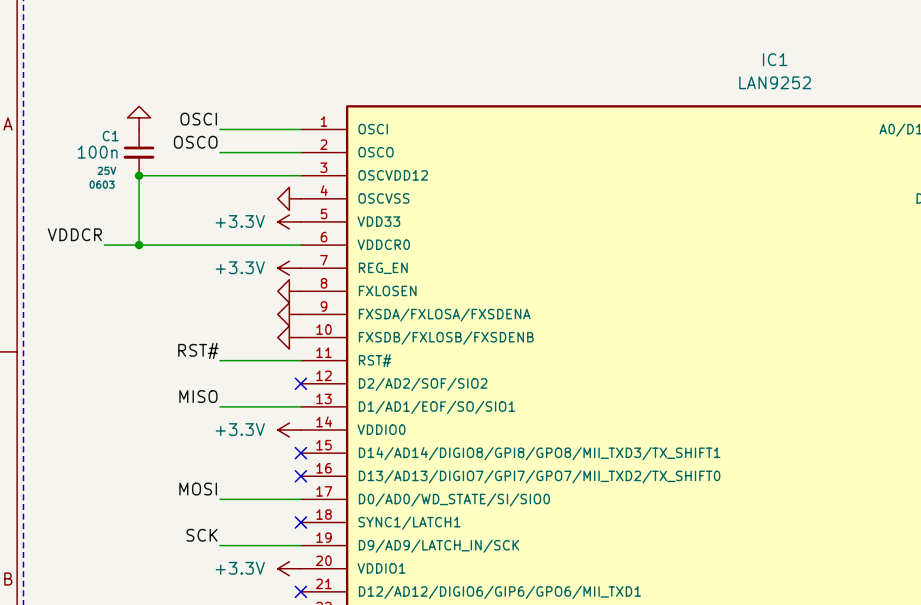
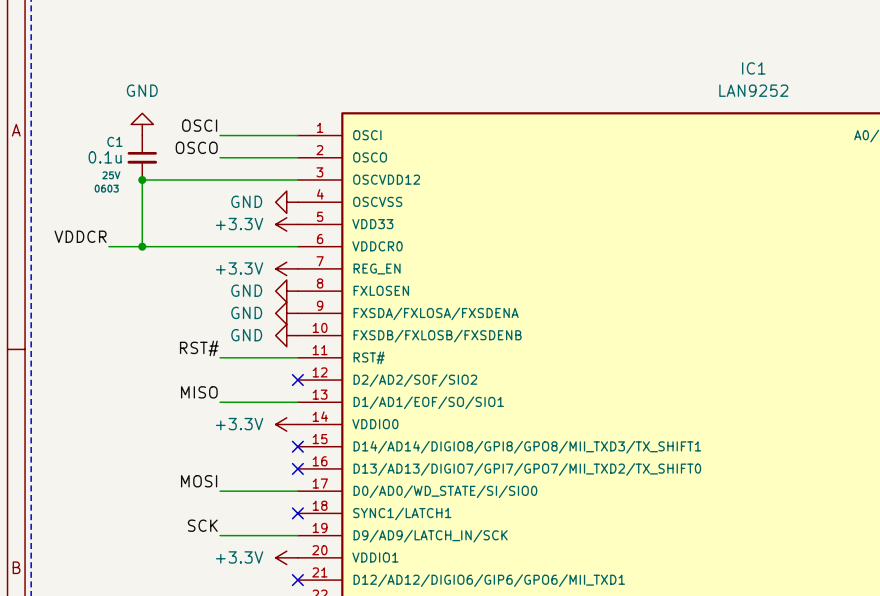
power symbol text: none -> GND (142, 90)
C1 value: 100n (97, 152) -> 0.1u (105, 157)
power symbol text: none -> GND (246, 201)
power symbol text: none -> GND (246, 290)
power symbol text: none -> GND (246, 312)
power symbol text: none -> GND (246, 335)

